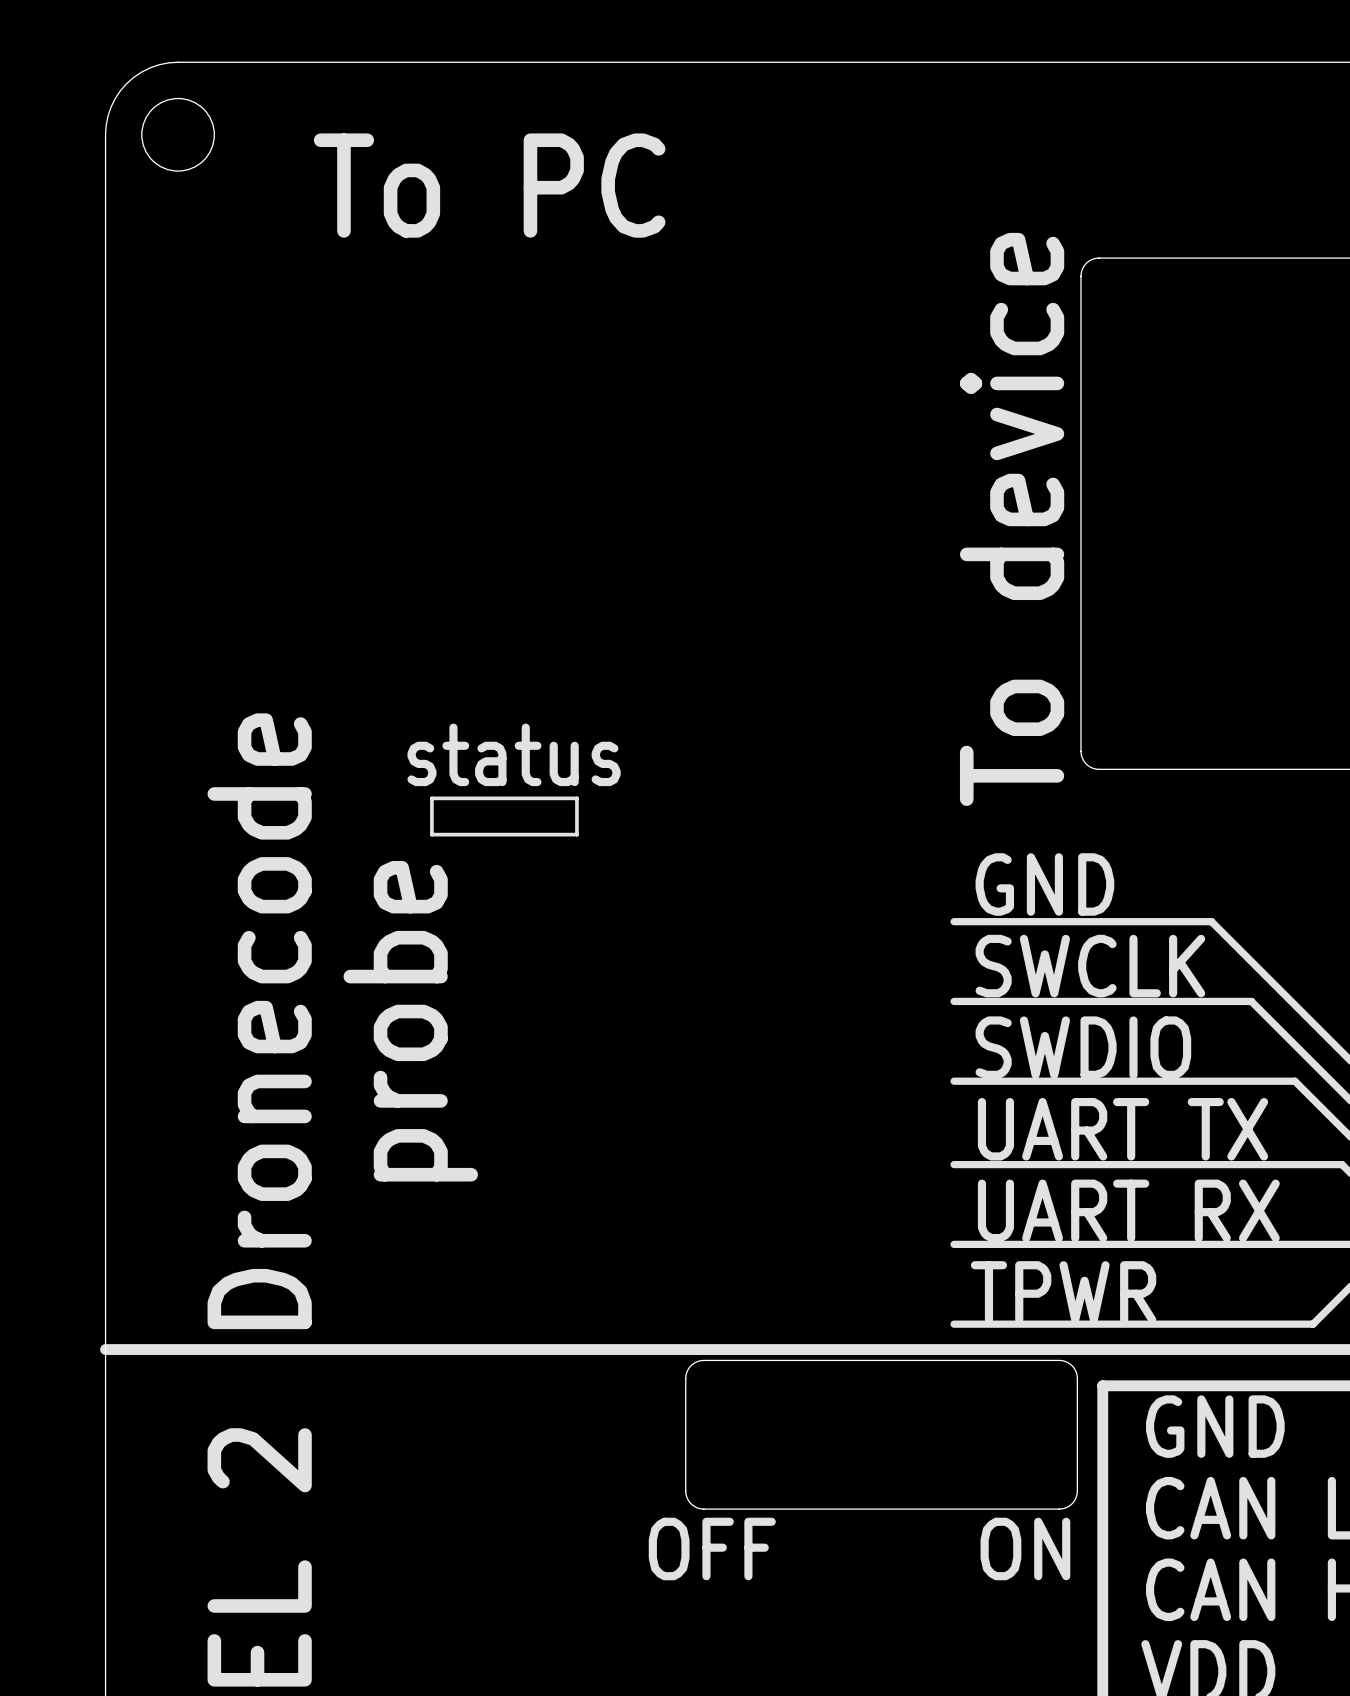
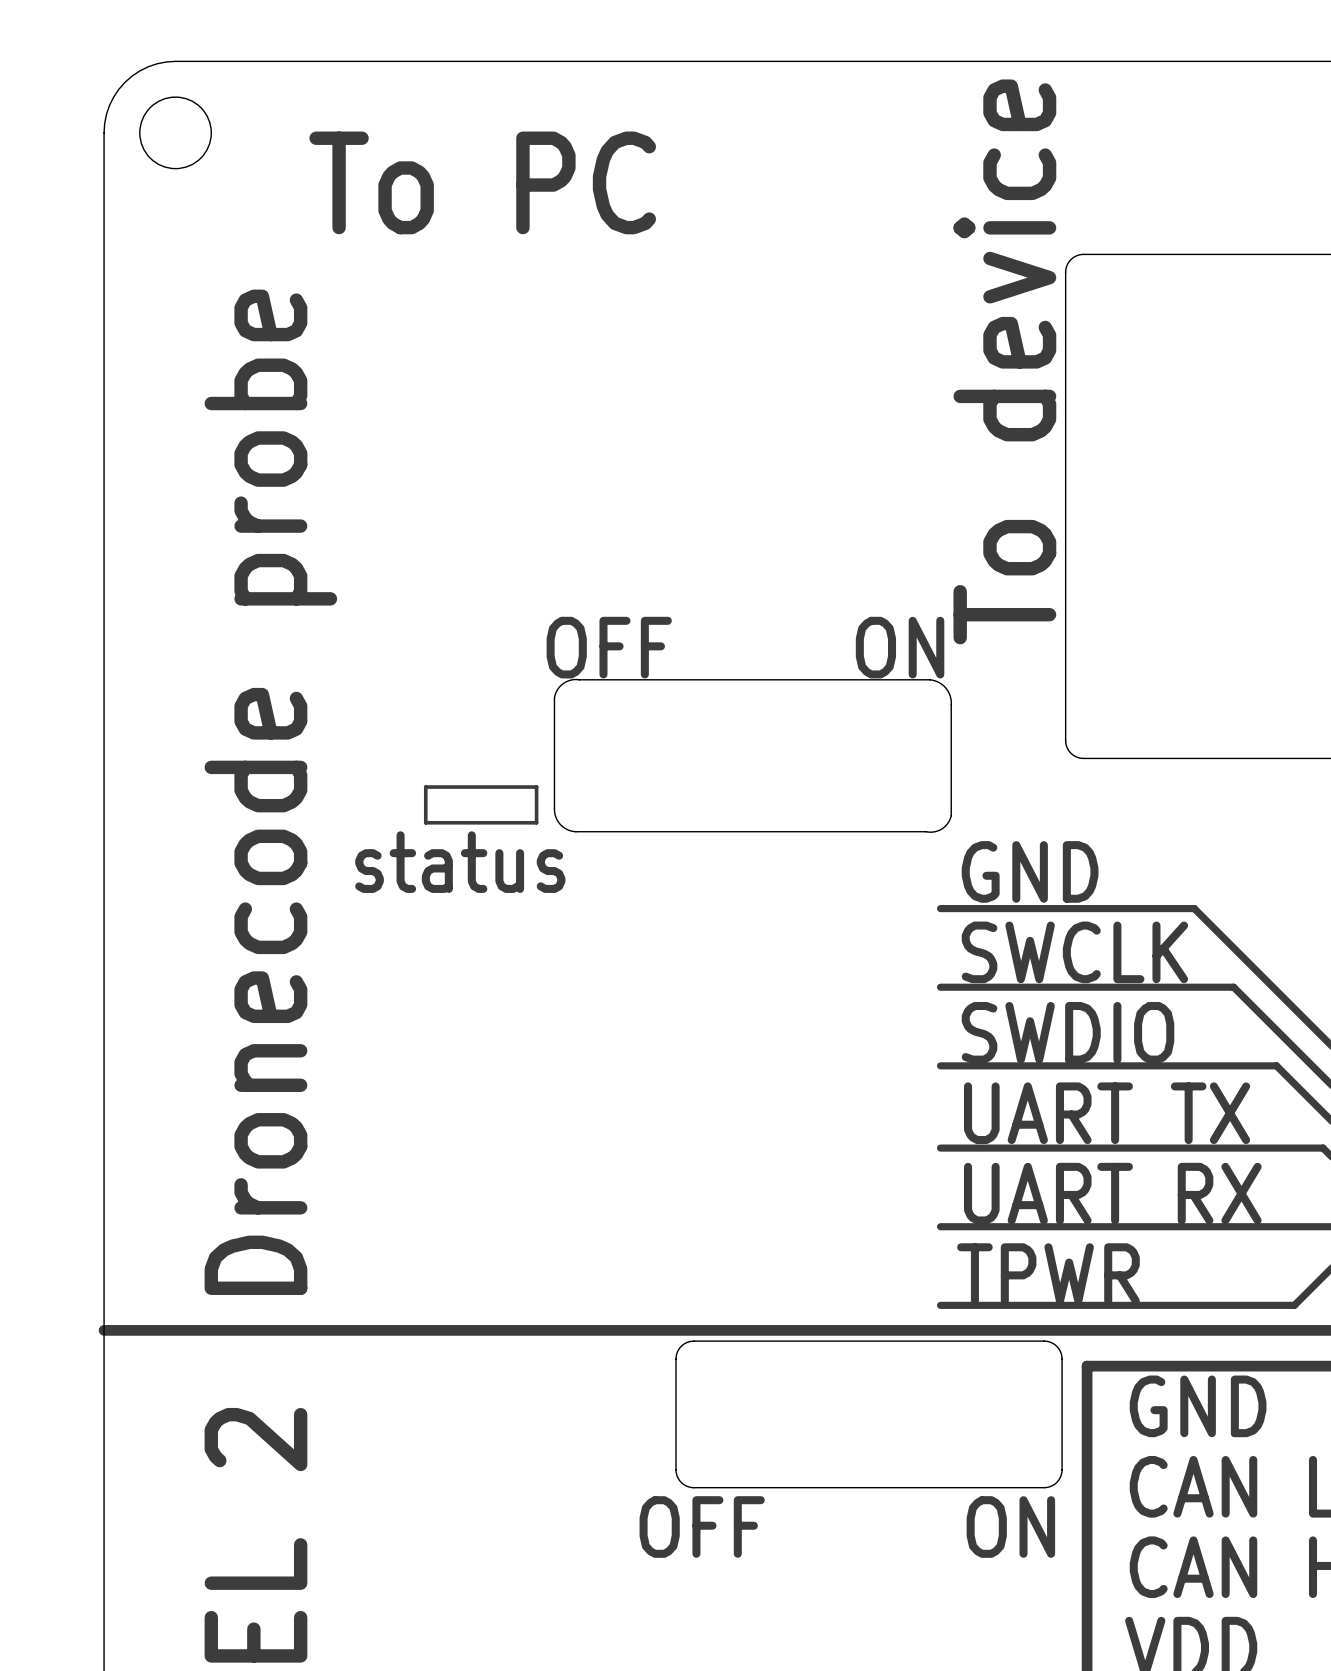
text position: To device (1012, 519) -> To device (1004, 361)
text: none -> OFF (609, 647)
text: none -> ON (900, 647)
board edge: none -> (579, 679) (935, 681) (945, 687) (951, 701) (950, 818) (942, 828) (931, 832) (570, 830) (560, 824) (554, 811) (554, 697) (557, 689) (563, 683) (571, 680) (579, 679)
text position: status (514, 754) -> status (460, 862)
line: (544, 798) (576, 798) (576, 834) (544, 834) -> (536, 787) (536, 822)
text: Dronecode (259, 1021) -> Dronecode probe (270, 792)
text: probe (410, 1021) -> none

